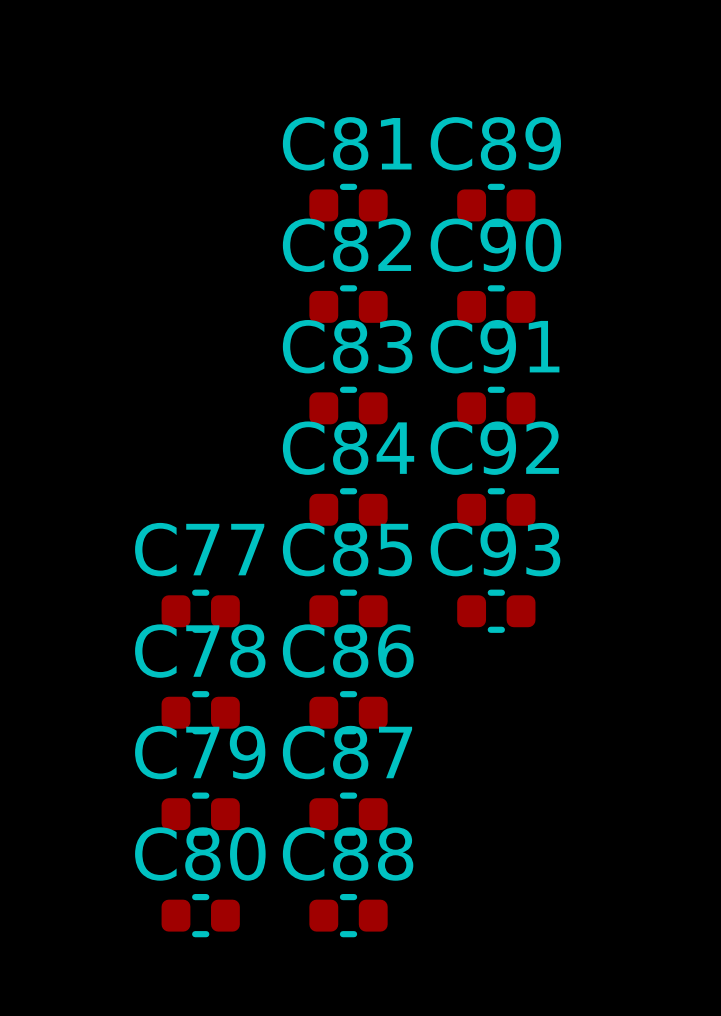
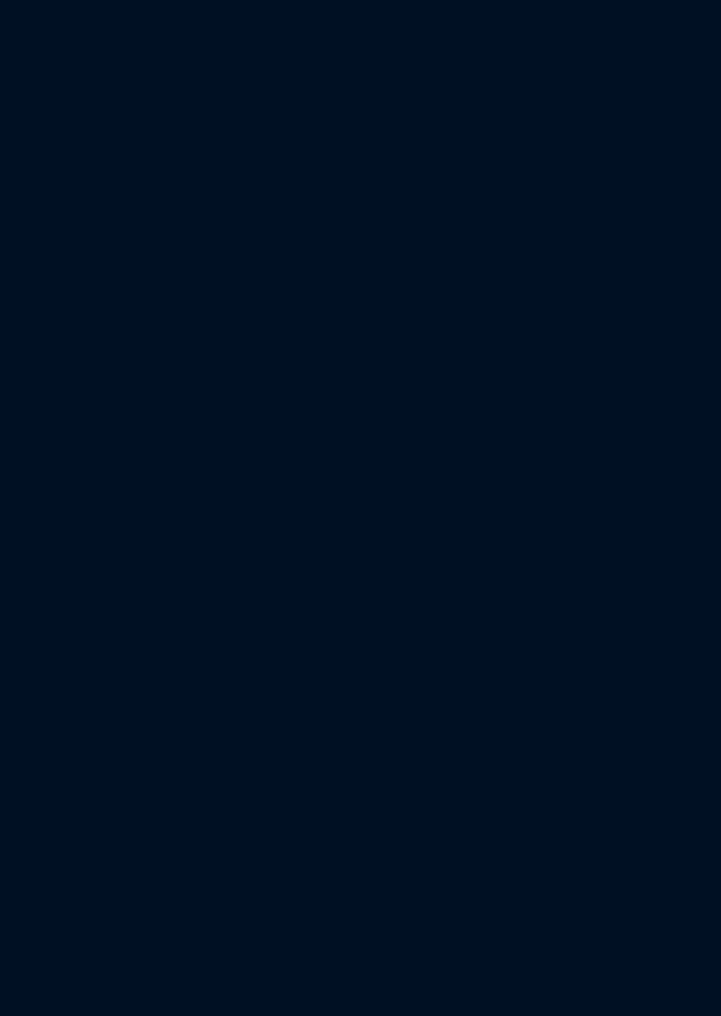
C81: (348, 205) -> none
C89: (496, 205) -> none
C82: (348, 306) -> none
C90: (496, 306) -> none
C83: (348, 408) -> none
C91: (496, 408) -> none
C84: (348, 509) -> none
C92: (496, 509) -> none
C77: (200, 611) -> none
C85: (348, 611) -> none
C93: (496, 611) -> none
C78: (200, 712) -> none
C86: (348, 712) -> none
C79: (200, 814) -> none
C87: (348, 814) -> none
C80: (200, 915) -> none
C88: (348, 915) -> none

